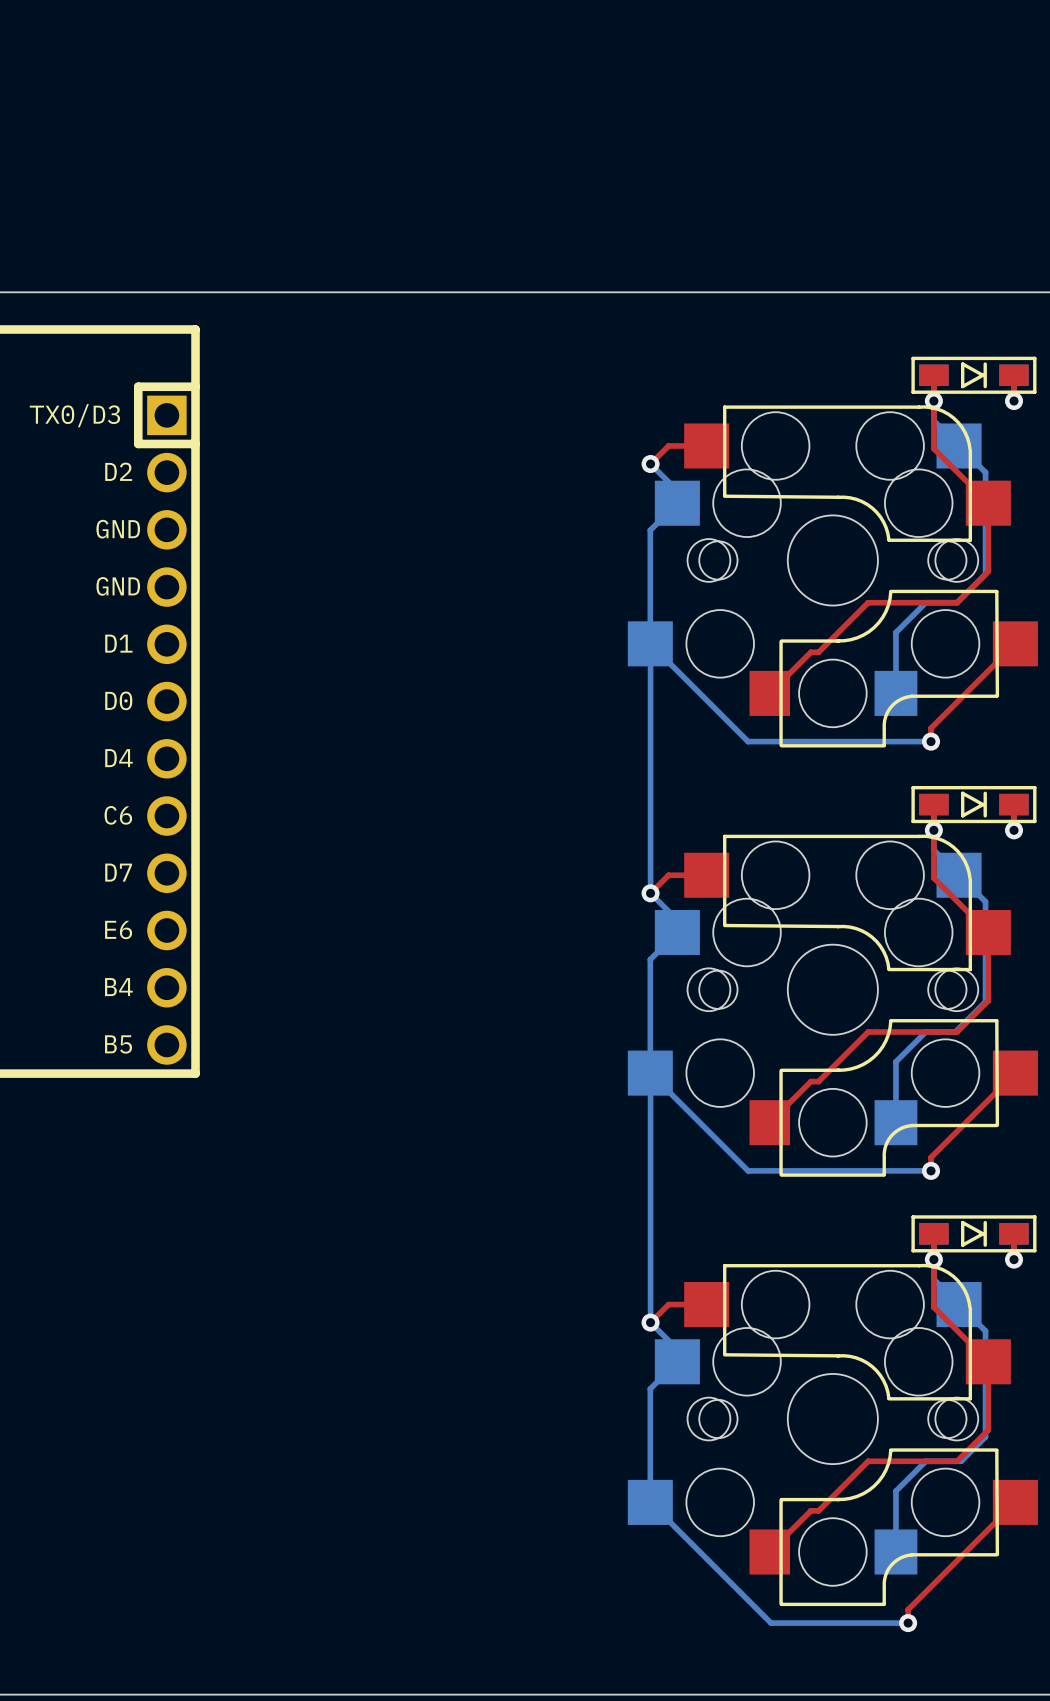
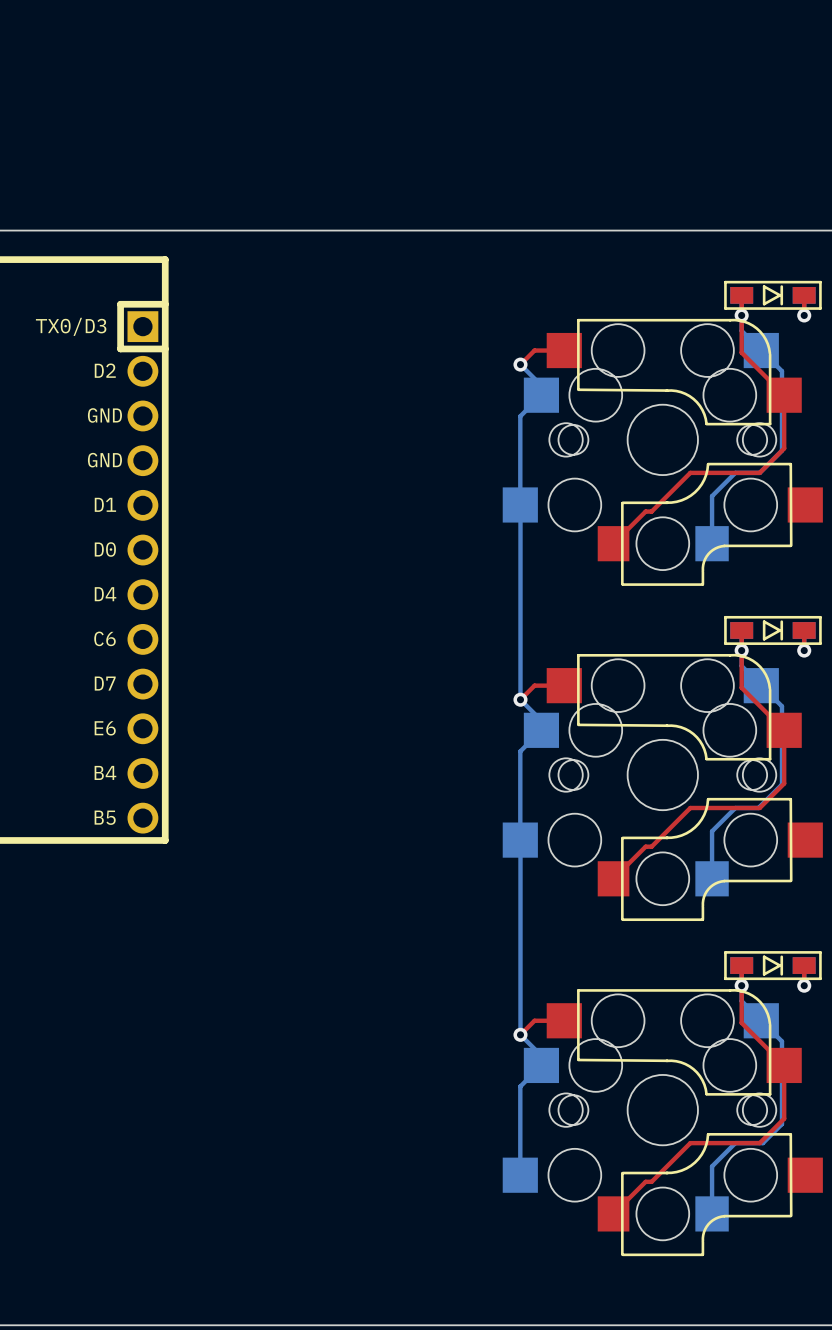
top track: (1015, 643) (931, 728) (931, 741) -> none
bottom track: (650, 644) (748, 741) (931, 741) -> none
via: (931, 741) -> none
bottom track: (650, 1073) (748, 1170) (931, 1170) -> none
top track: (1015, 1073) (931, 1157) (931, 1170) -> none
via: (931, 1170) -> none
bottom track: (650, 1502) (771, 1623) (908, 1623) -> none
top track: (1015, 1502) (908, 1609) (908, 1623) -> none
via: (908, 1623) -> none

